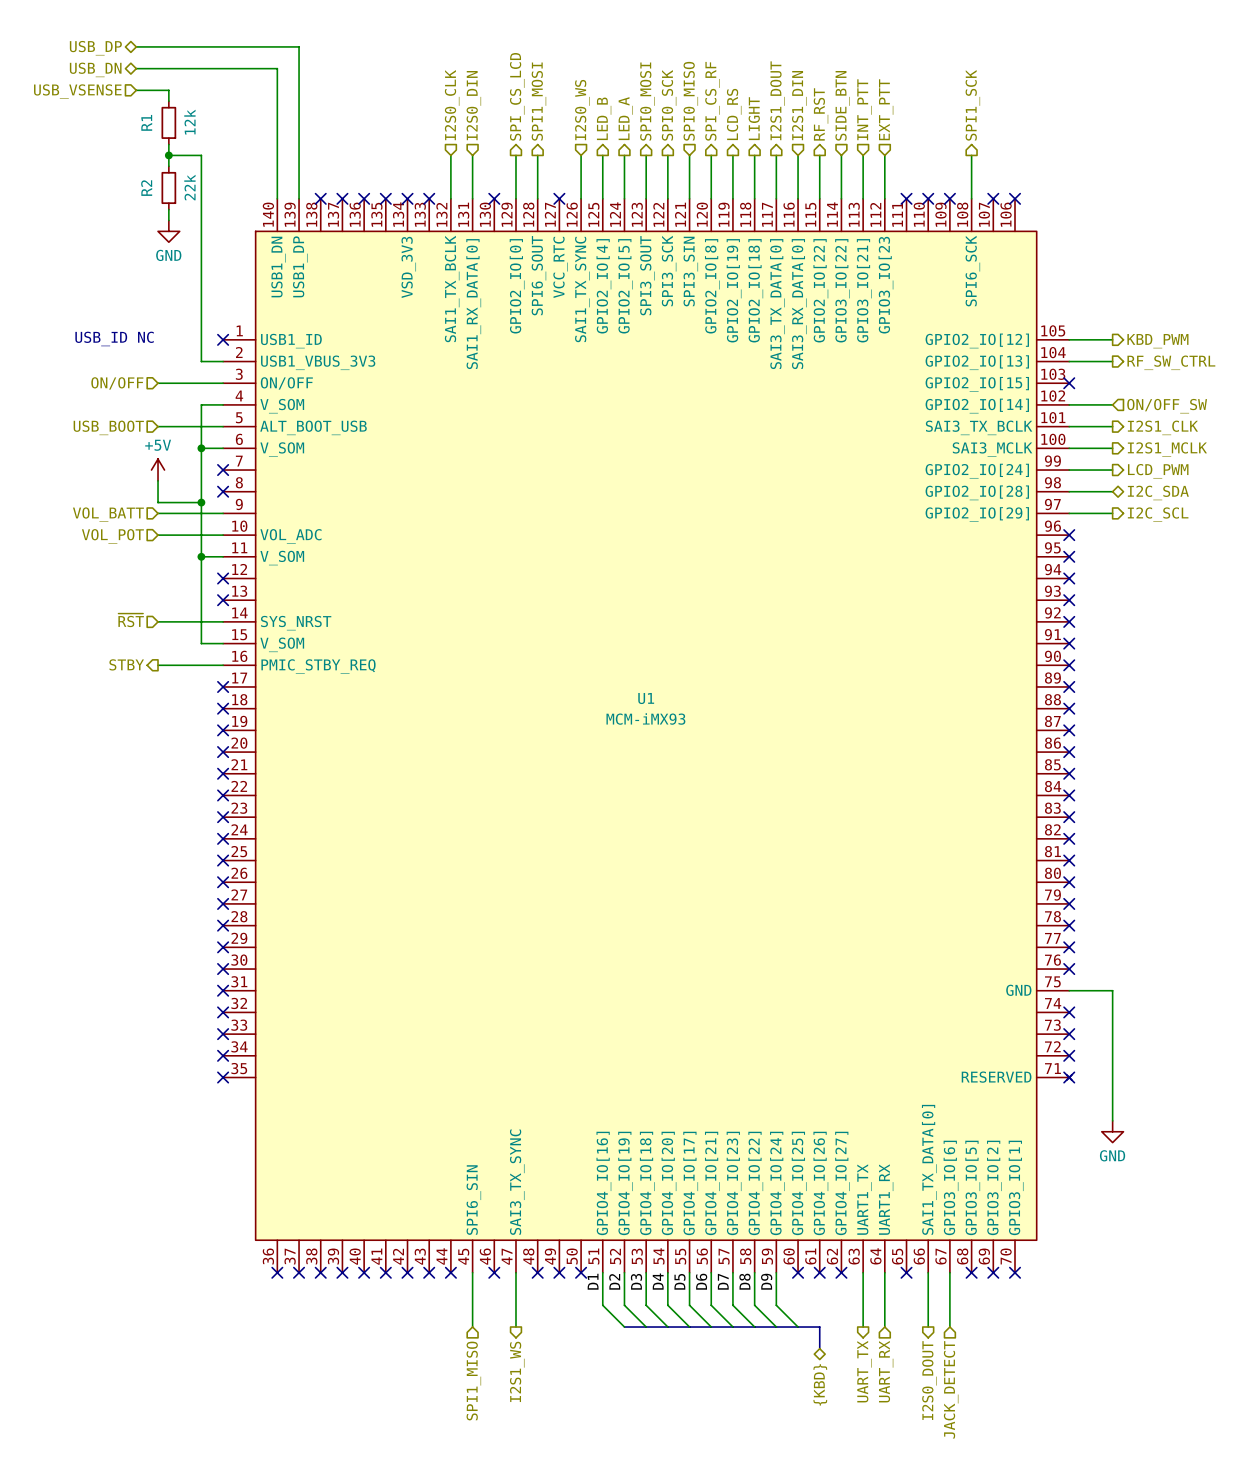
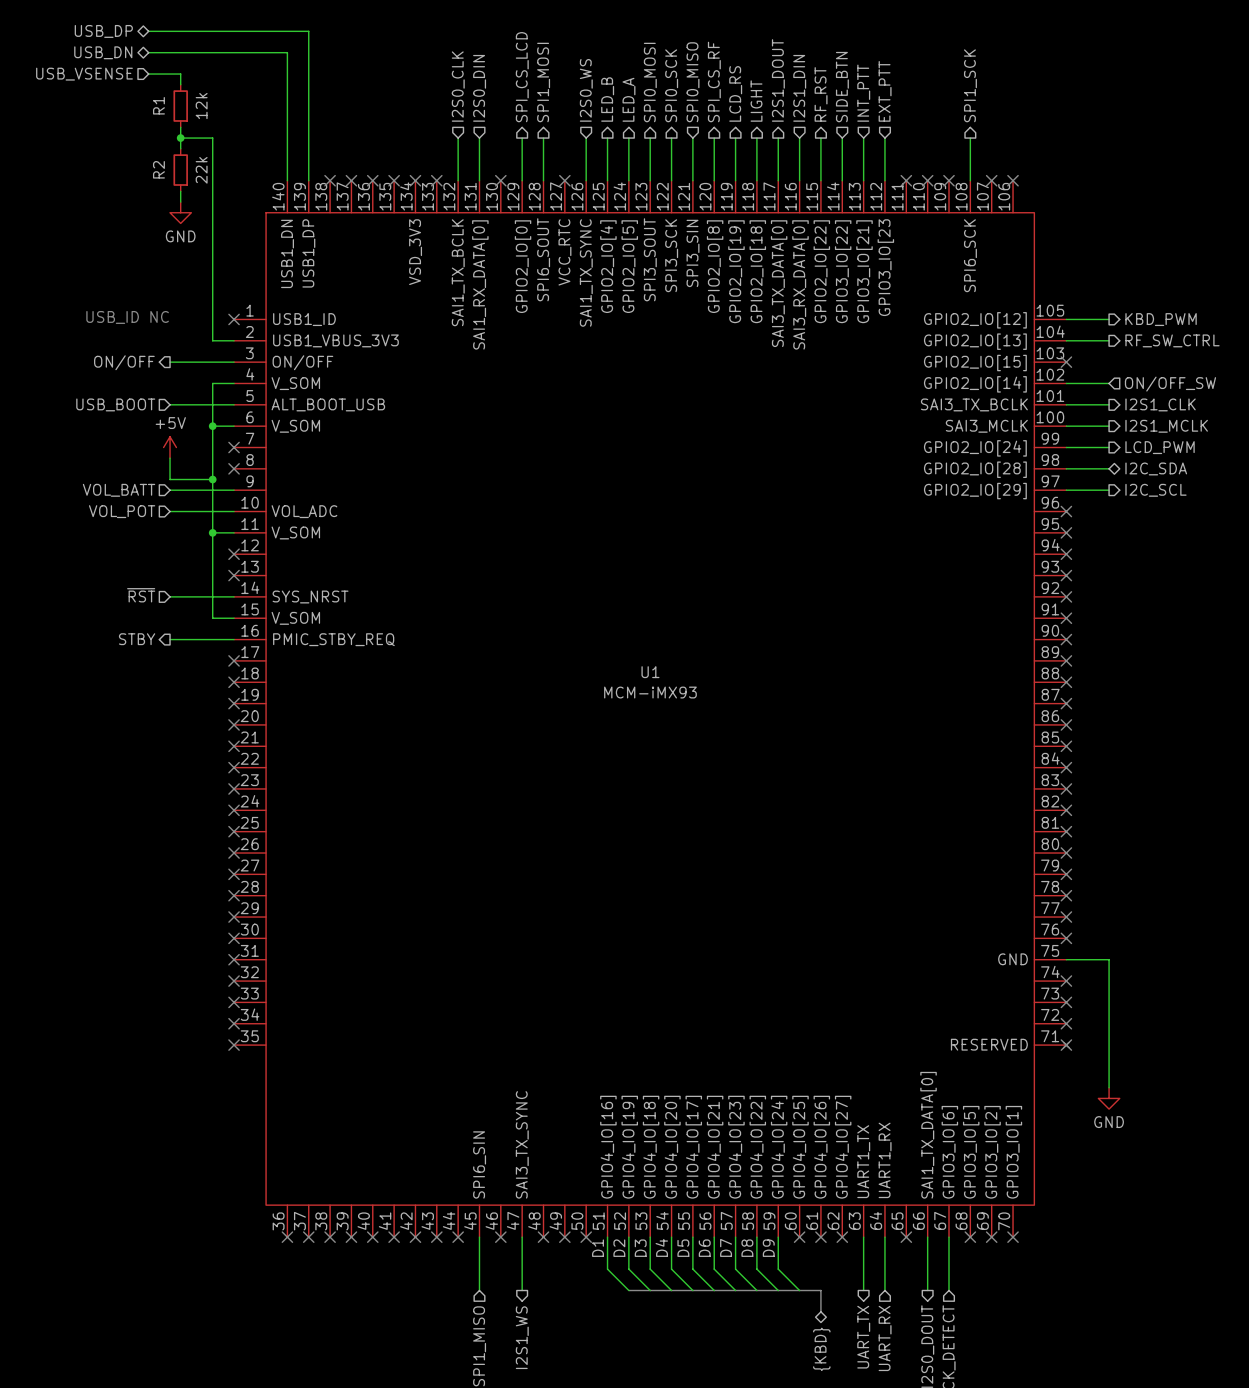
hierarchical label shape: input (117, 383) -> output (124, 362)

